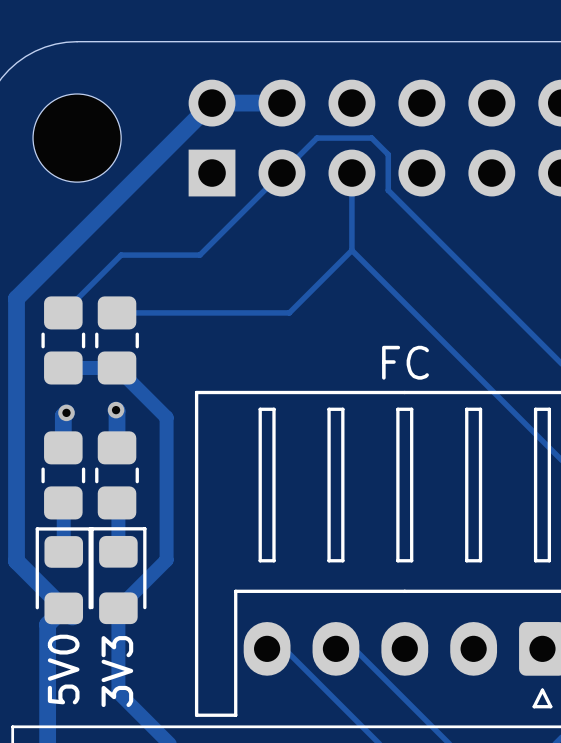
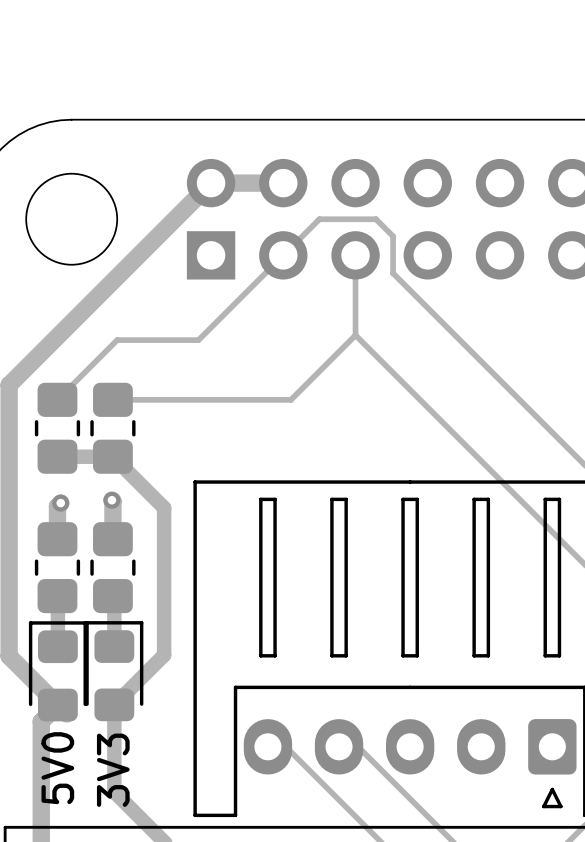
text: FC (405, 362) -> none

